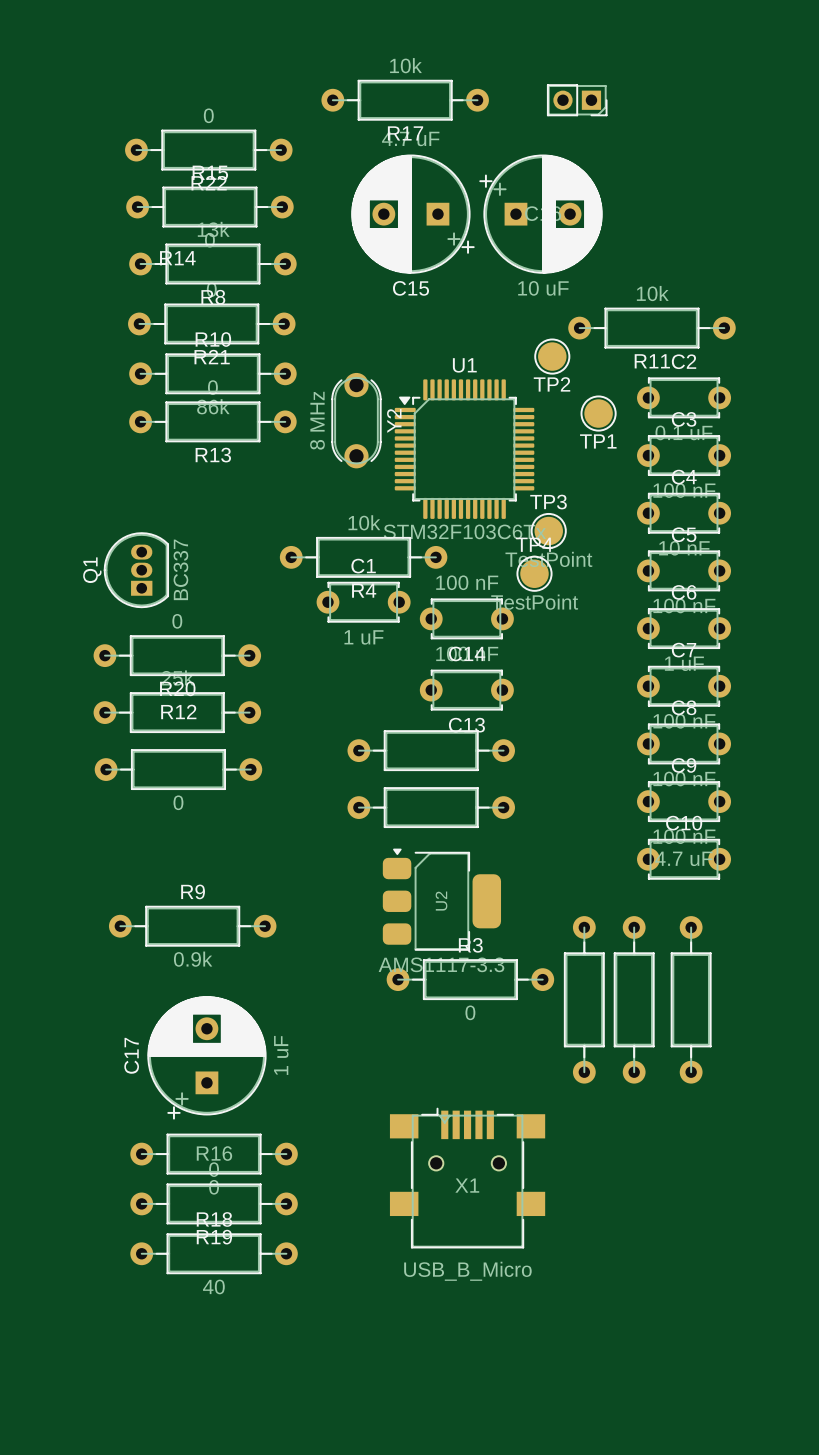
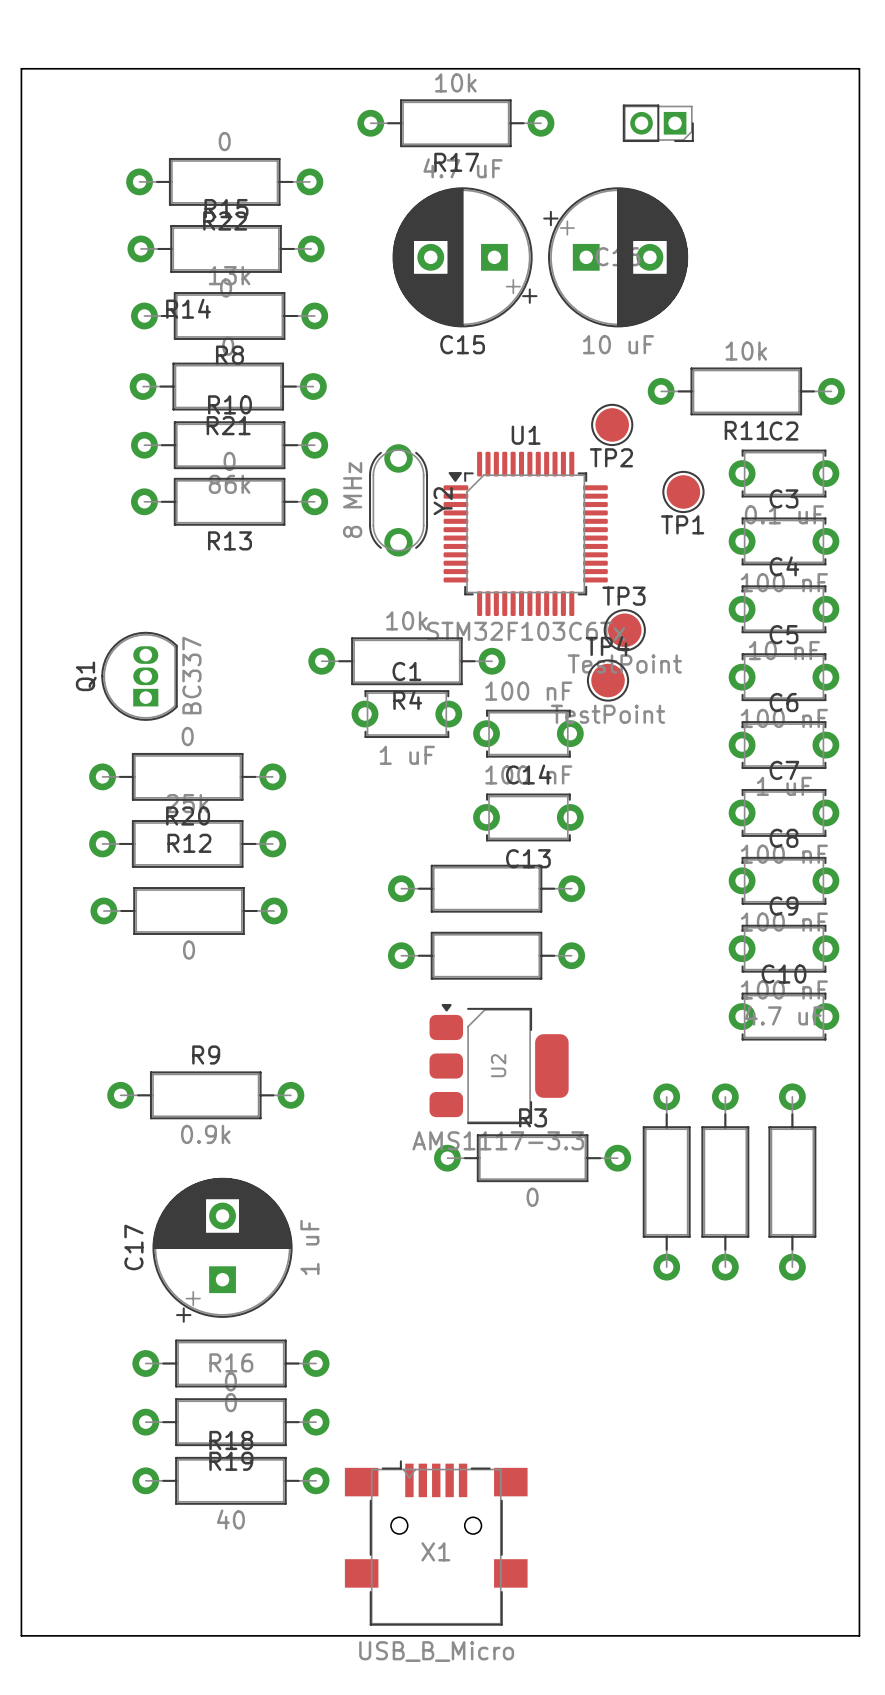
board edge: none -> (21, 68) (859, 68) (859, 1635) (21, 1635) (21, 68)
TP2 position: (552, 356) -> (612, 424)
X1 position: (467, 1178) -> (436, 1543)

